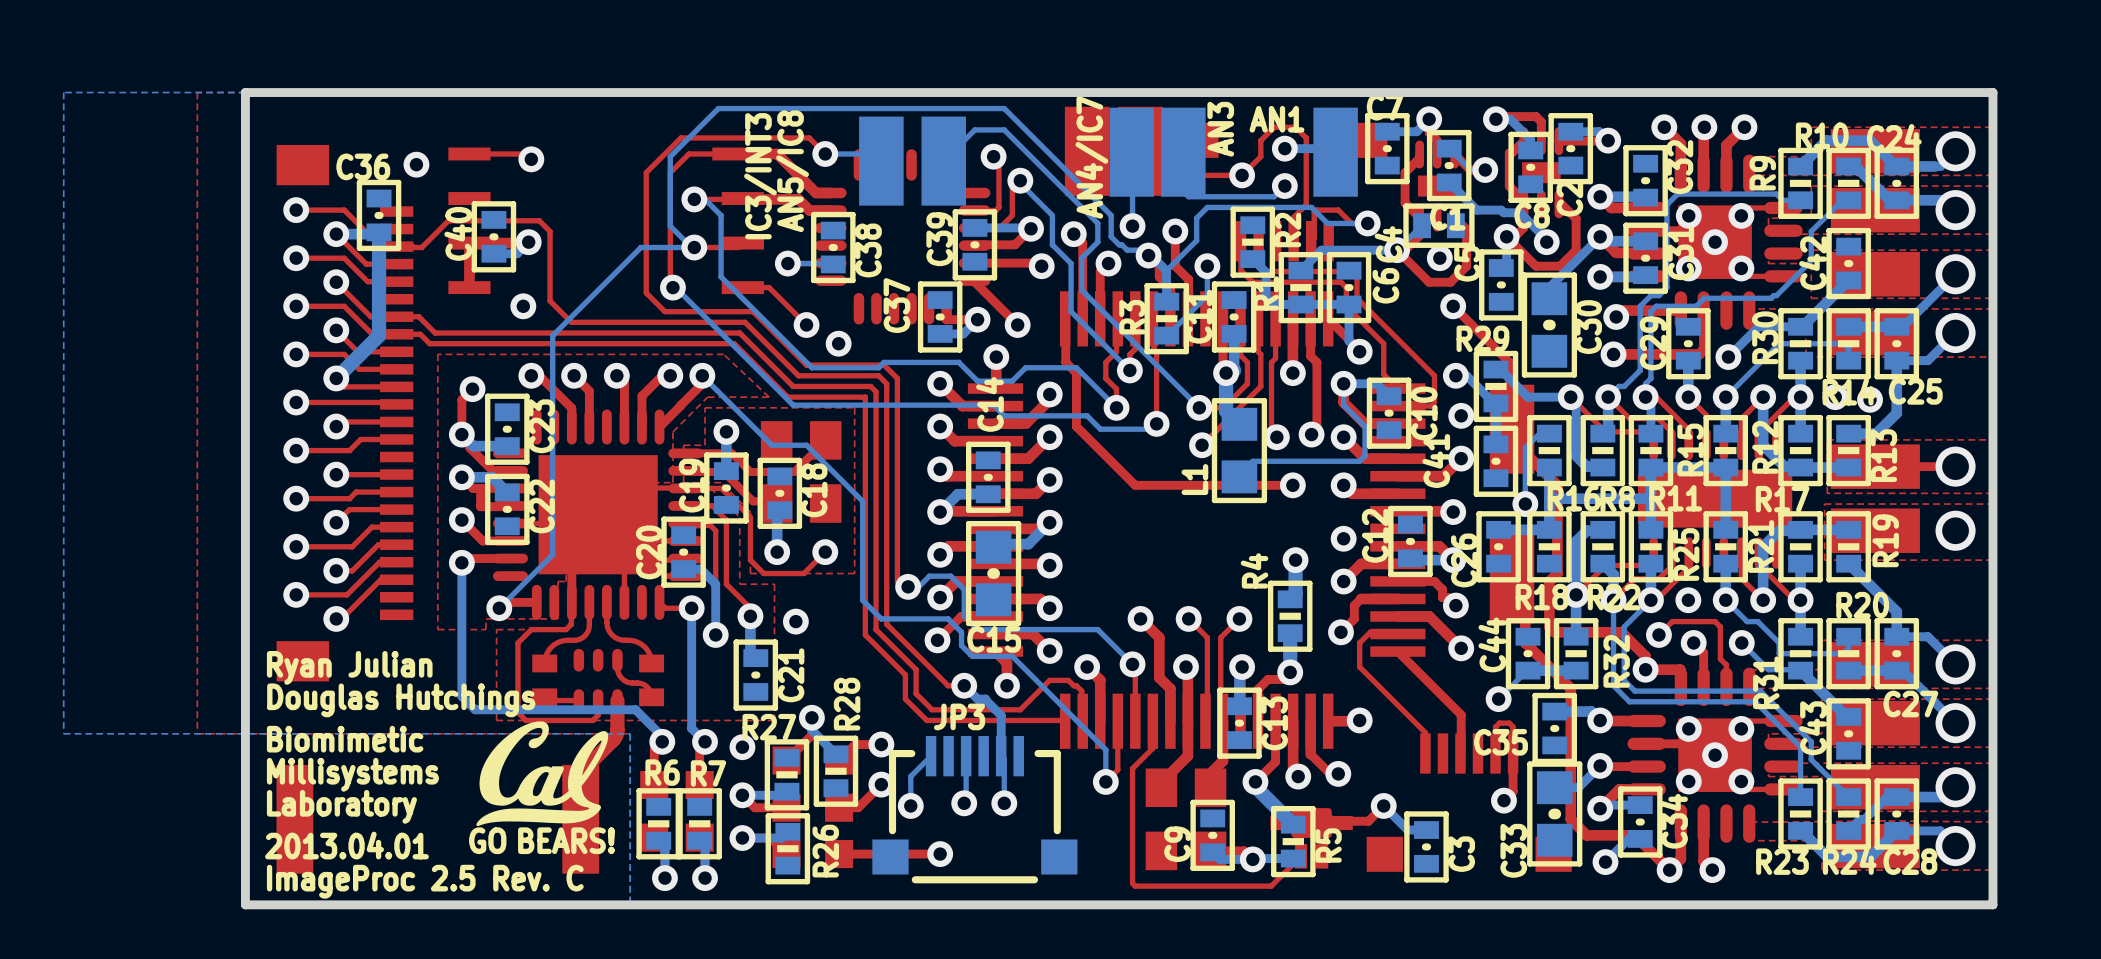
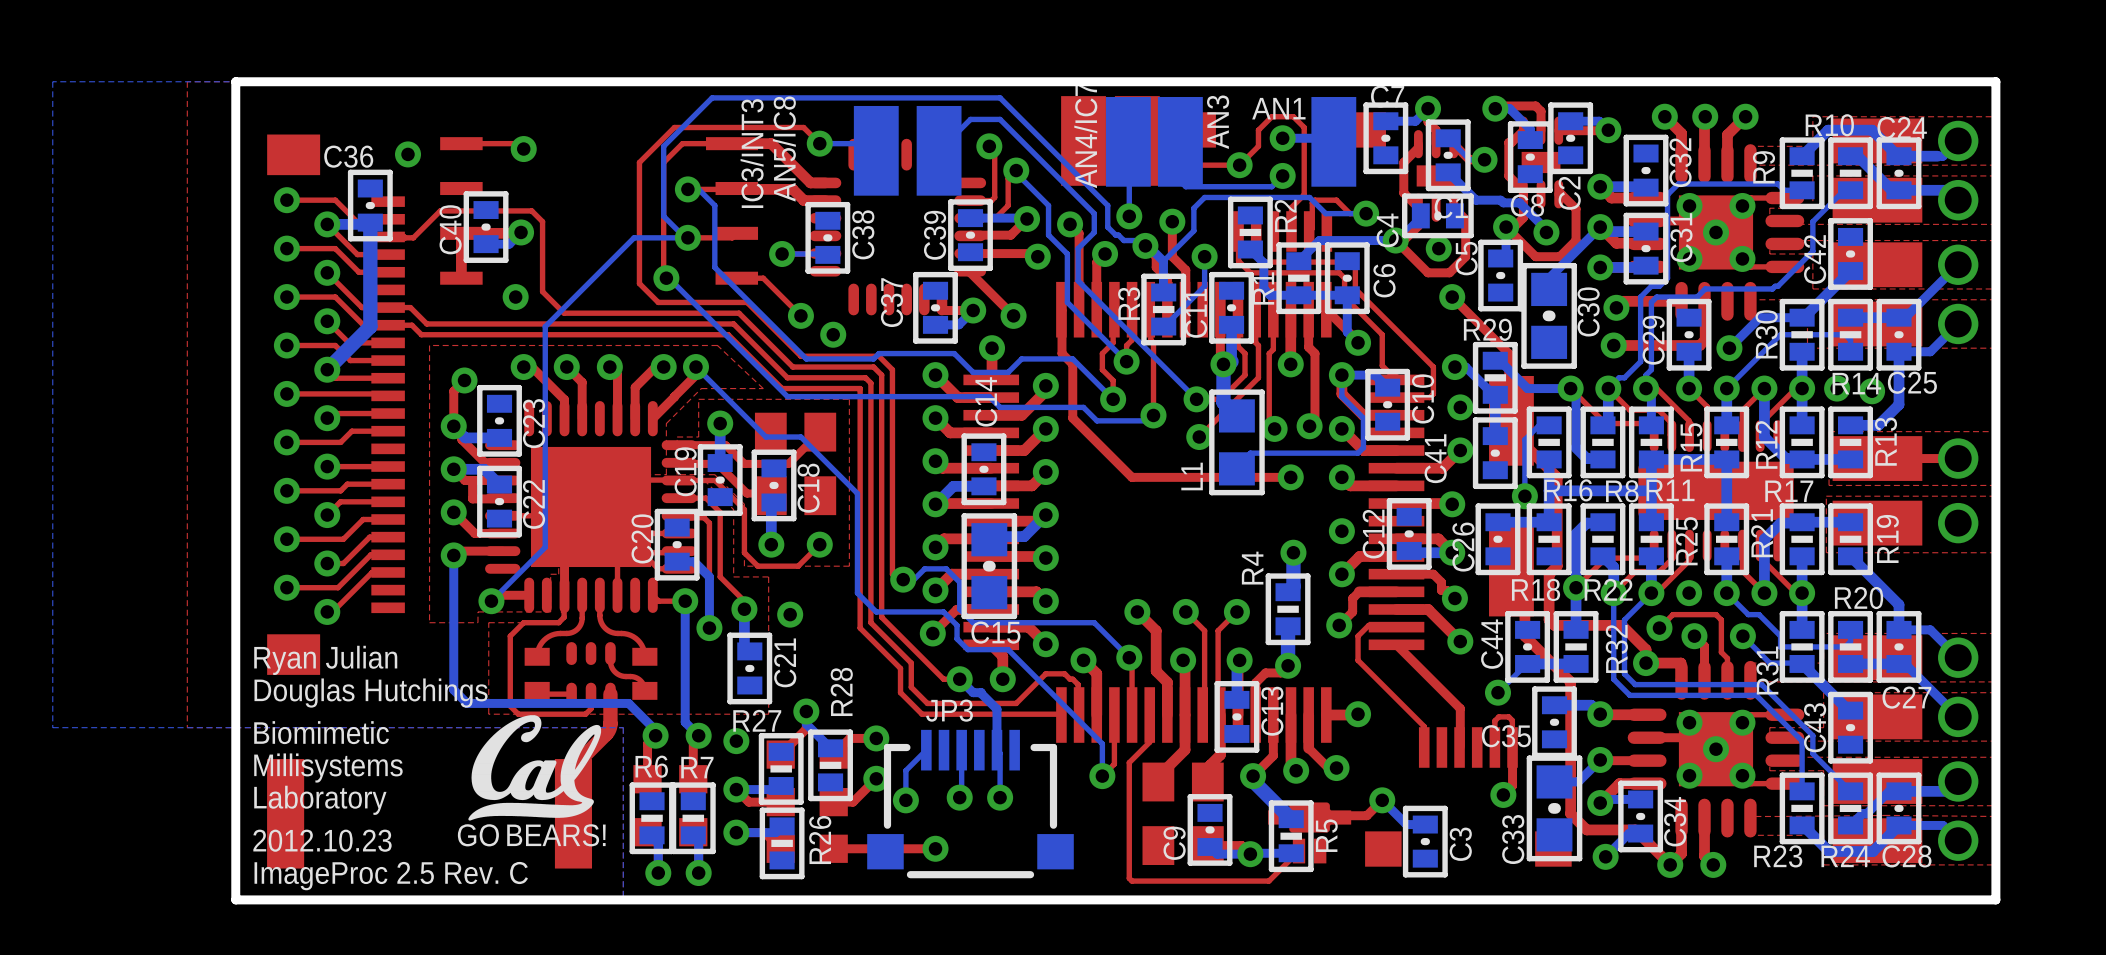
text: 2013.04.01 (346, 845) -> 2012.10.23 (322, 840)

